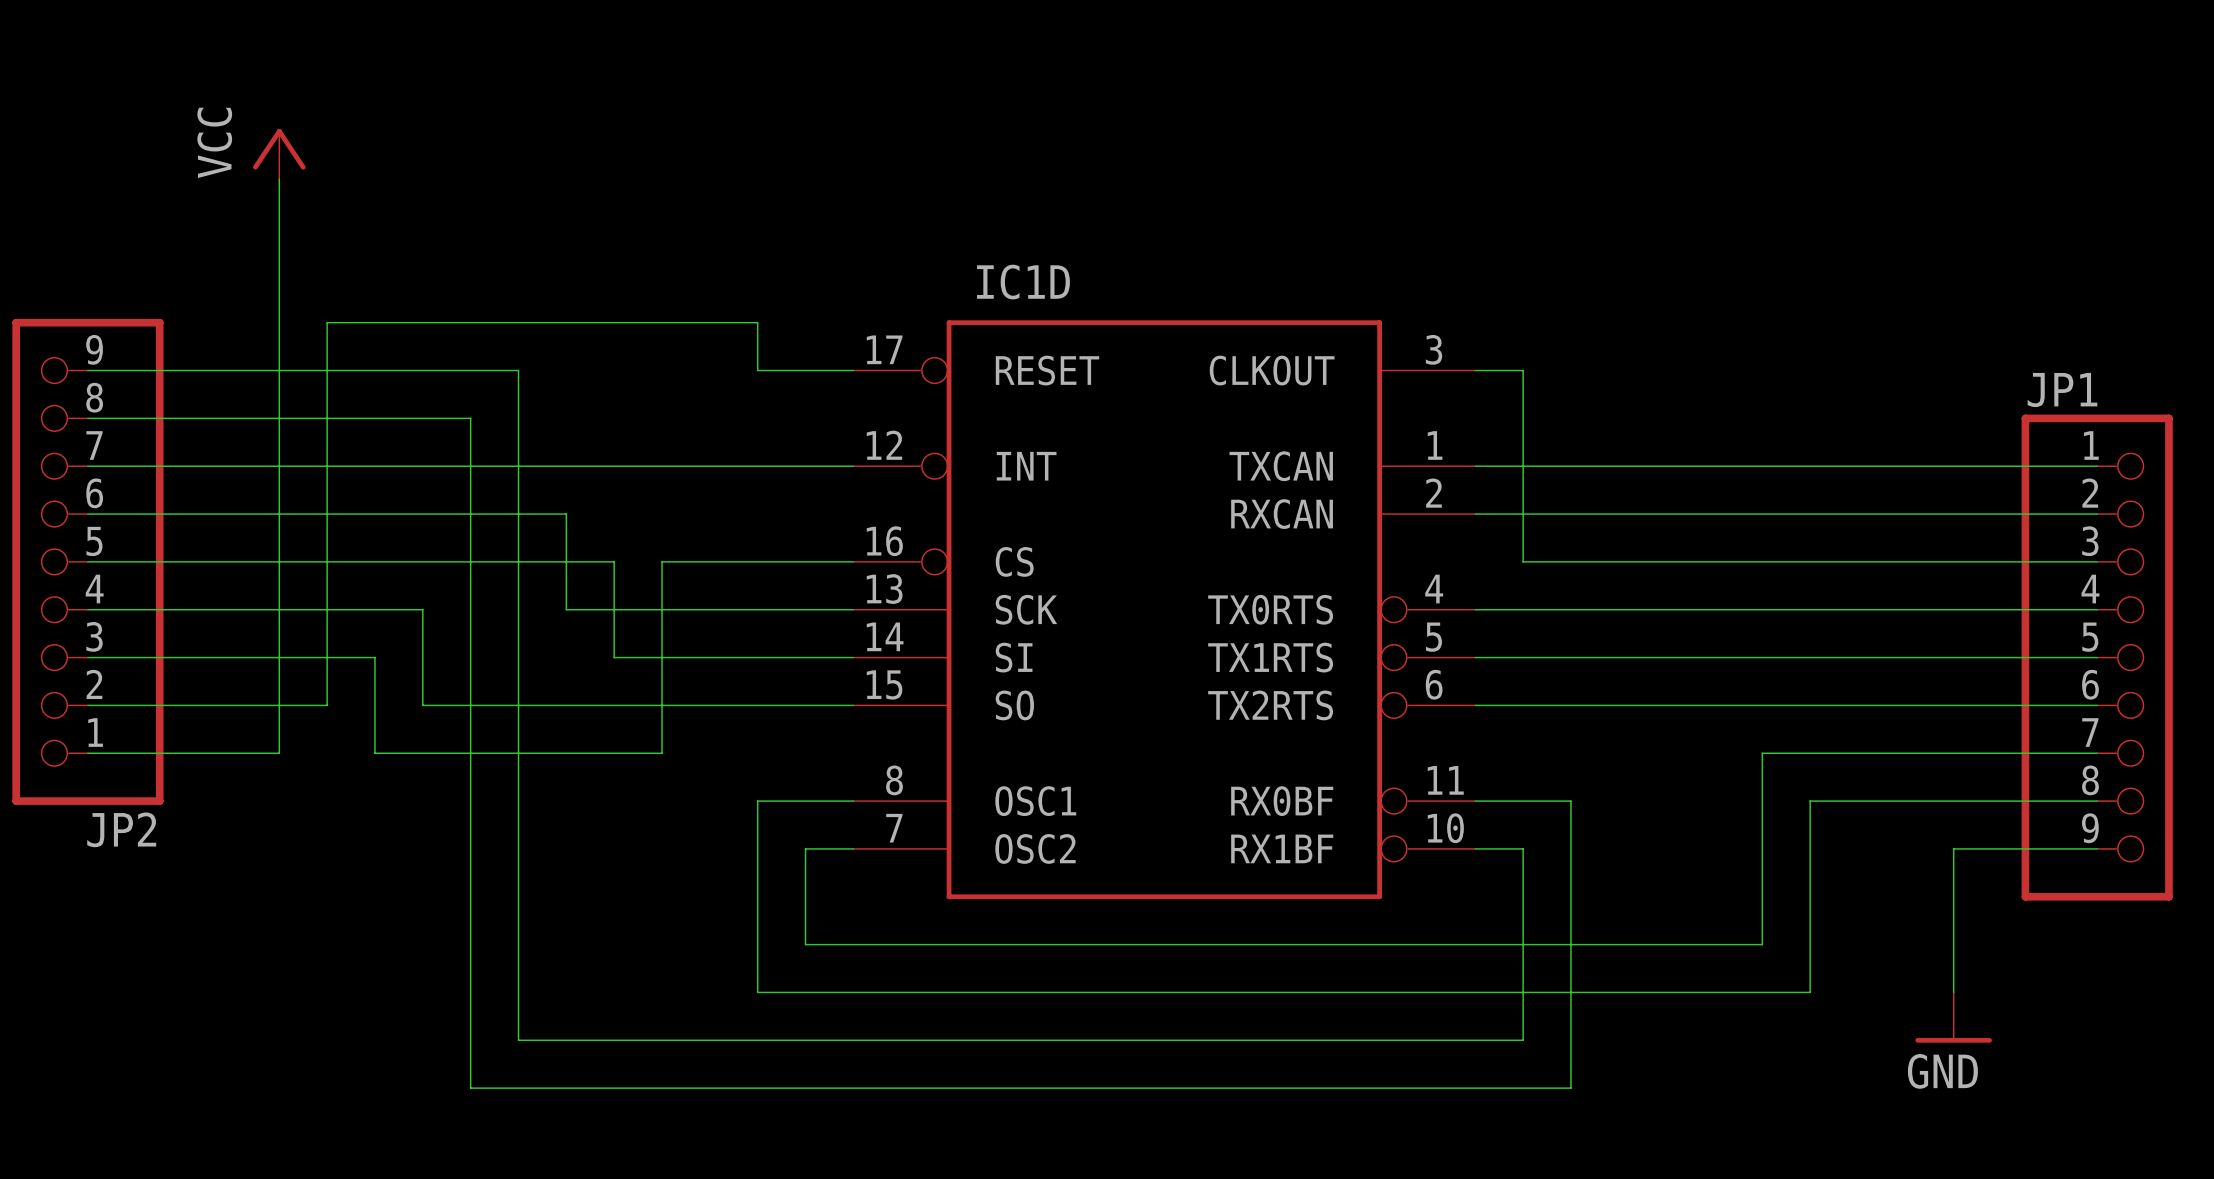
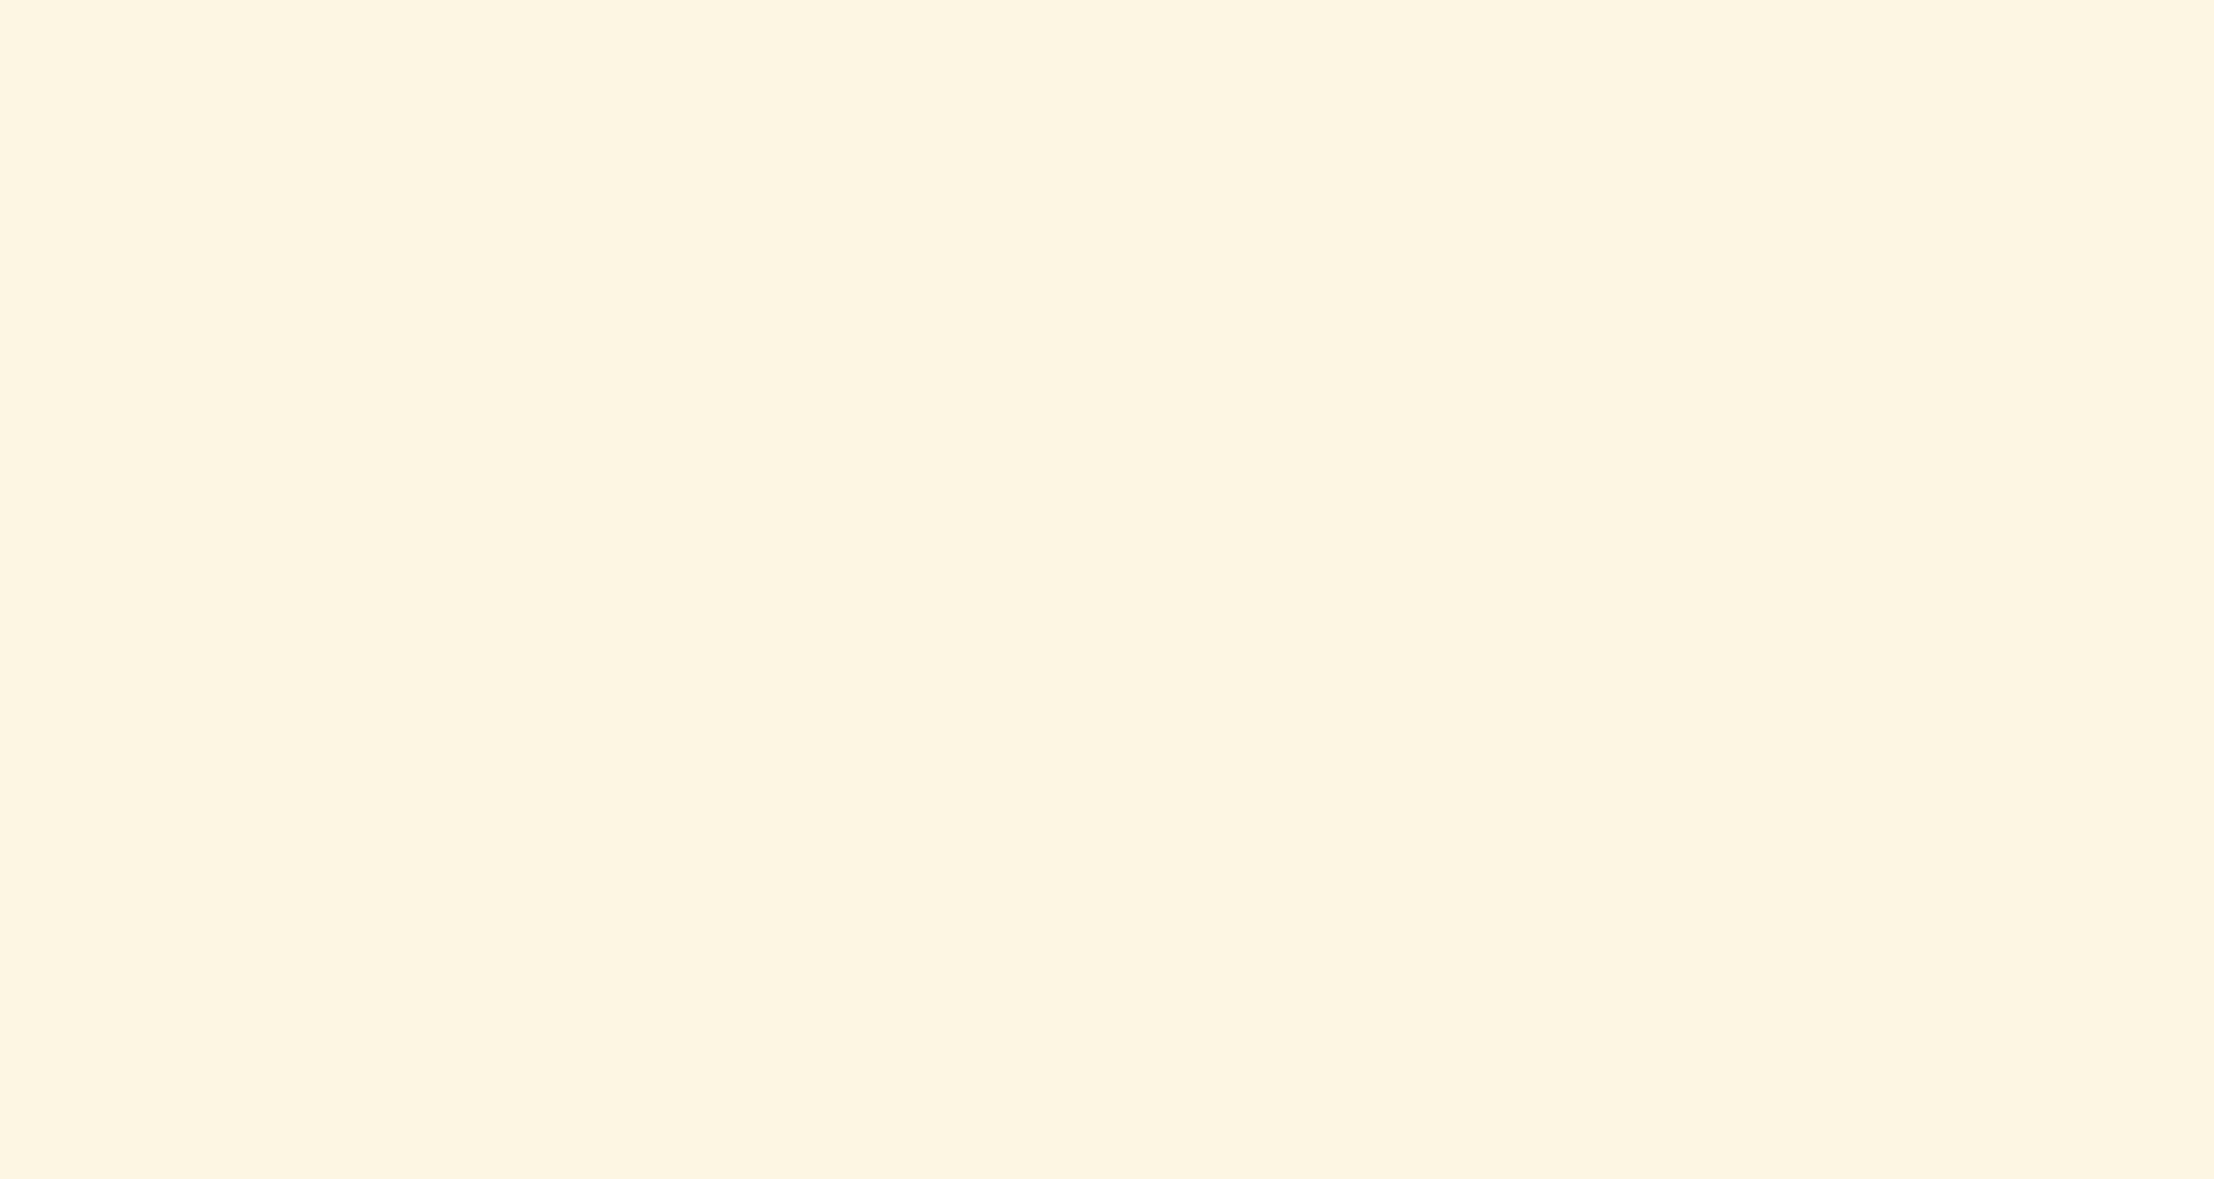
power symbol: VCC (279, 154) -> none
wire: (279, 179) (279, 753) (87, 753) -> none
wire: (87, 370) (518, 370) (518, 1040) (1523, 1040) (1523, 848) (1475, 848) -> none
wire: (853, 370) (757, 370) (757, 322) (327, 322) (327, 705) (87, 705) -> none
wire: (1475, 370) (1523, 370) (1523, 561) (2097, 561) -> none
wire: (87, 418) (470, 418) (470, 1088) (1570, 1088) (1570, 801) (1475, 801) -> none
wire: (87, 466) (853, 466) -> none
wire: (1475, 466) (2097, 466) -> none
wire: (87, 514) (566, 514) (566, 609) (853, 609) -> none
wire: (1475, 514) (2097, 514) -> none
wire: (87, 561) (614, 561) (614, 657) (853, 657) -> none
JP2: (87, 561) -> none
wire: (853, 561) (662, 561) (662, 753) (374, 753) (374, 657) (87, 657) -> none
wire: (87, 609) (422, 609) (422, 705) (853, 705) -> none
IC1D: (1164, 609) -> none
wire: (1475, 609) (2097, 609) -> none
wire: (1475, 657) (2097, 657) -> none
JP1: (2097, 657) -> none
wire: (1475, 705) (2097, 705) -> none
wire: (2097, 753) (1762, 753) (1762, 944) (805, 944) (805, 848) (853, 848) -> none
wire: (853, 801) (757, 801) (757, 992) (1810, 992) (1810, 801) (2097, 801) -> none
wire: (2097, 848) (1953, 848) (1953, 992) -> none
power symbol: GND (1953, 1017) -> none

